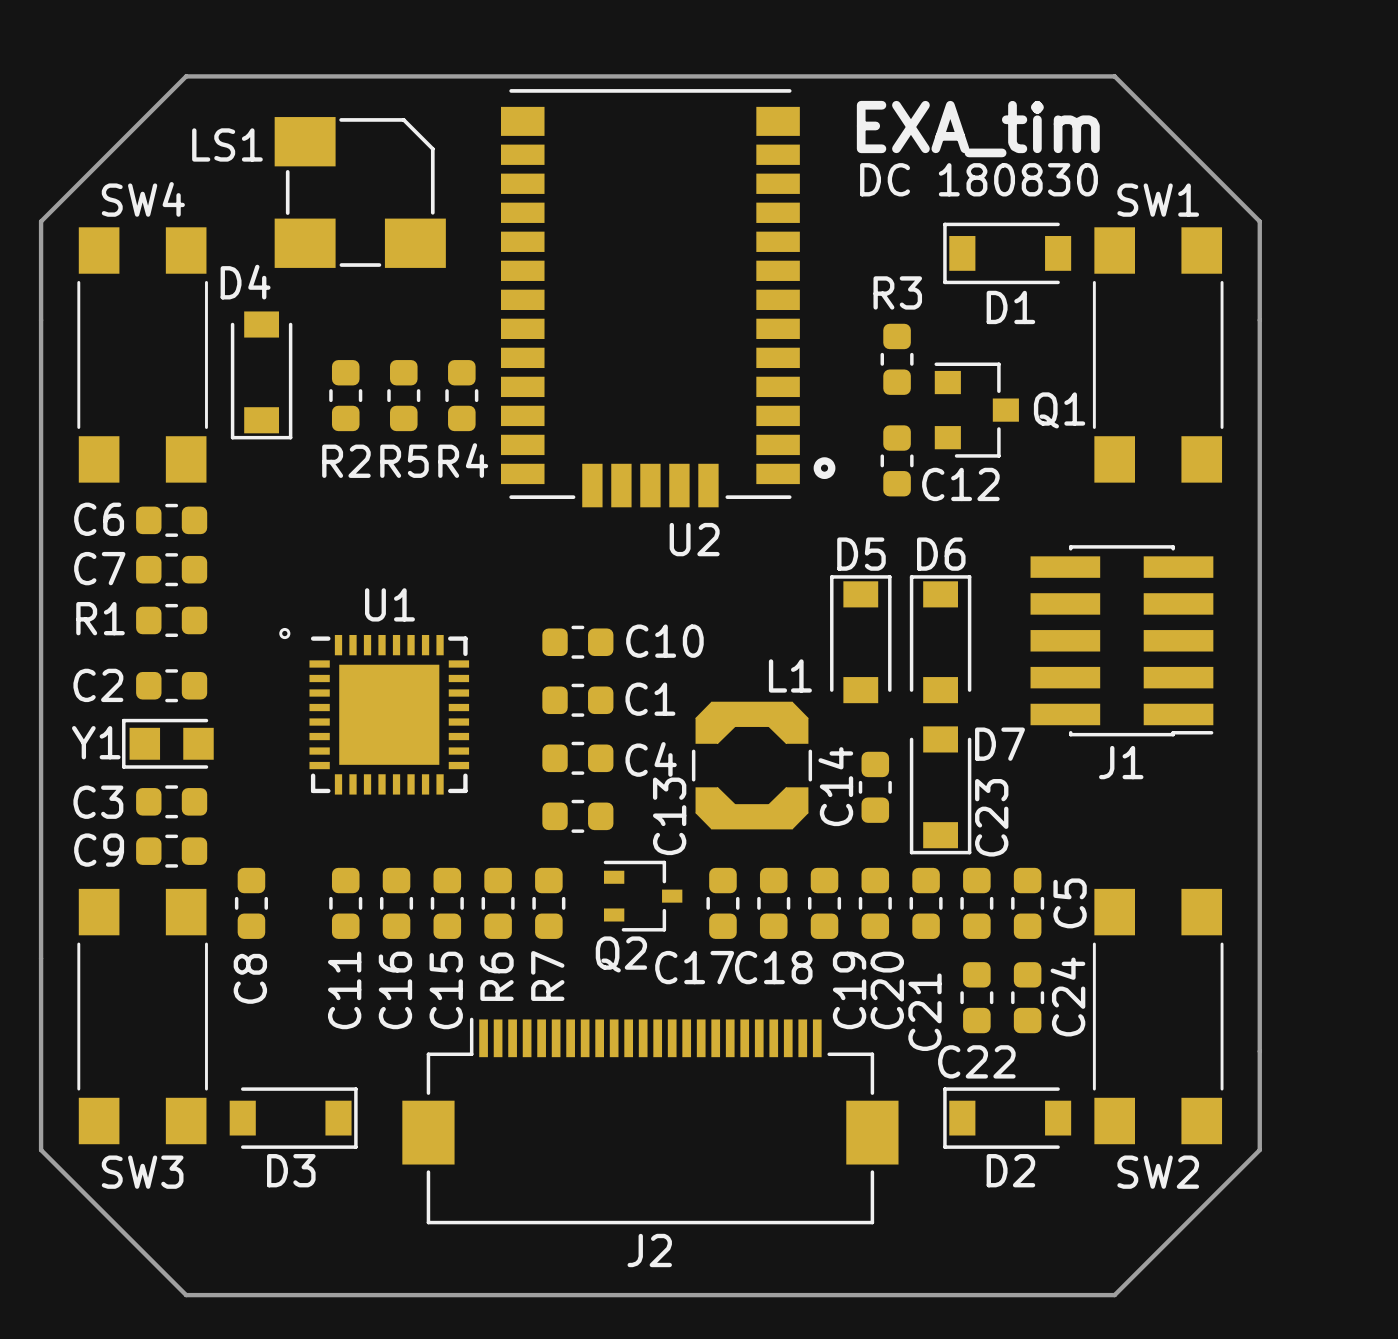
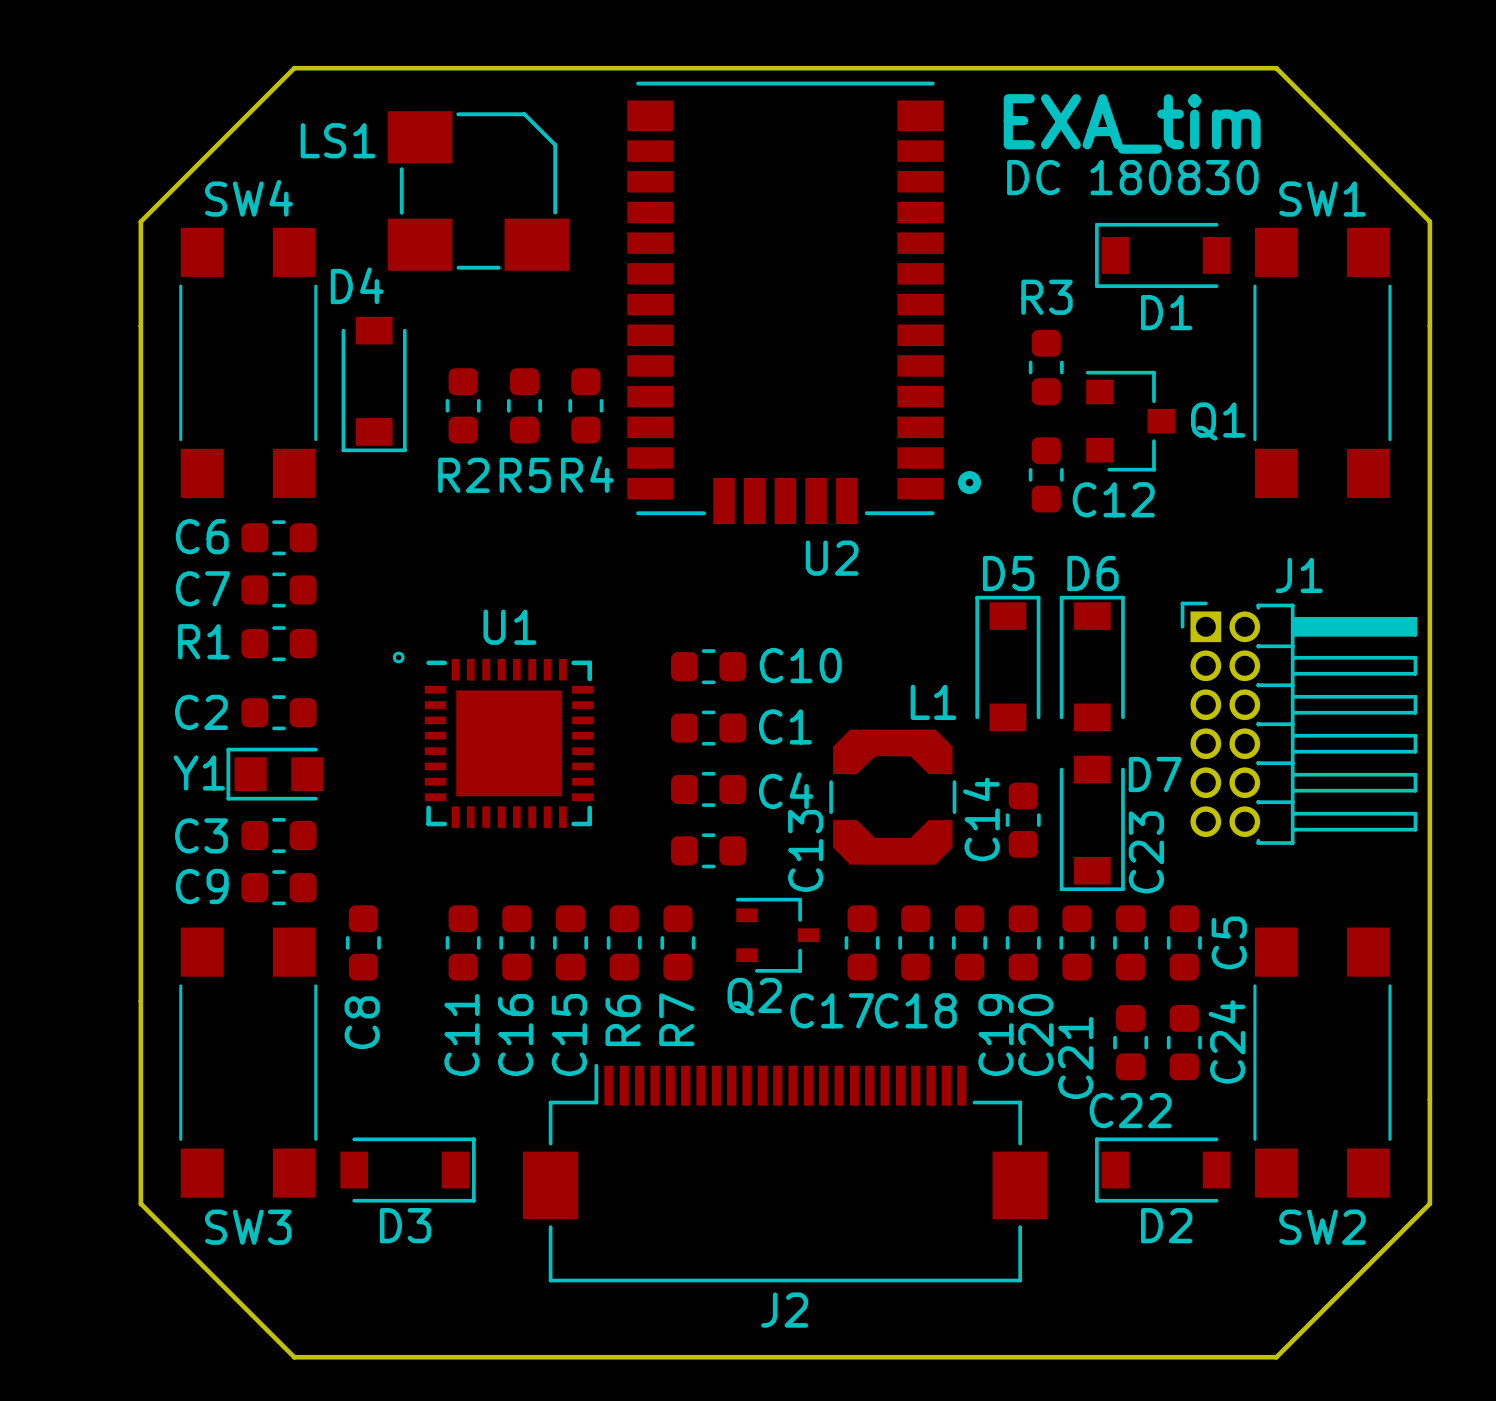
J1 footprint: [1030, 545, 1214, 737] -> [1180, 601, 1418, 845]
J1 name position: J1 (1121, 762) -> J1 (1299, 575)

